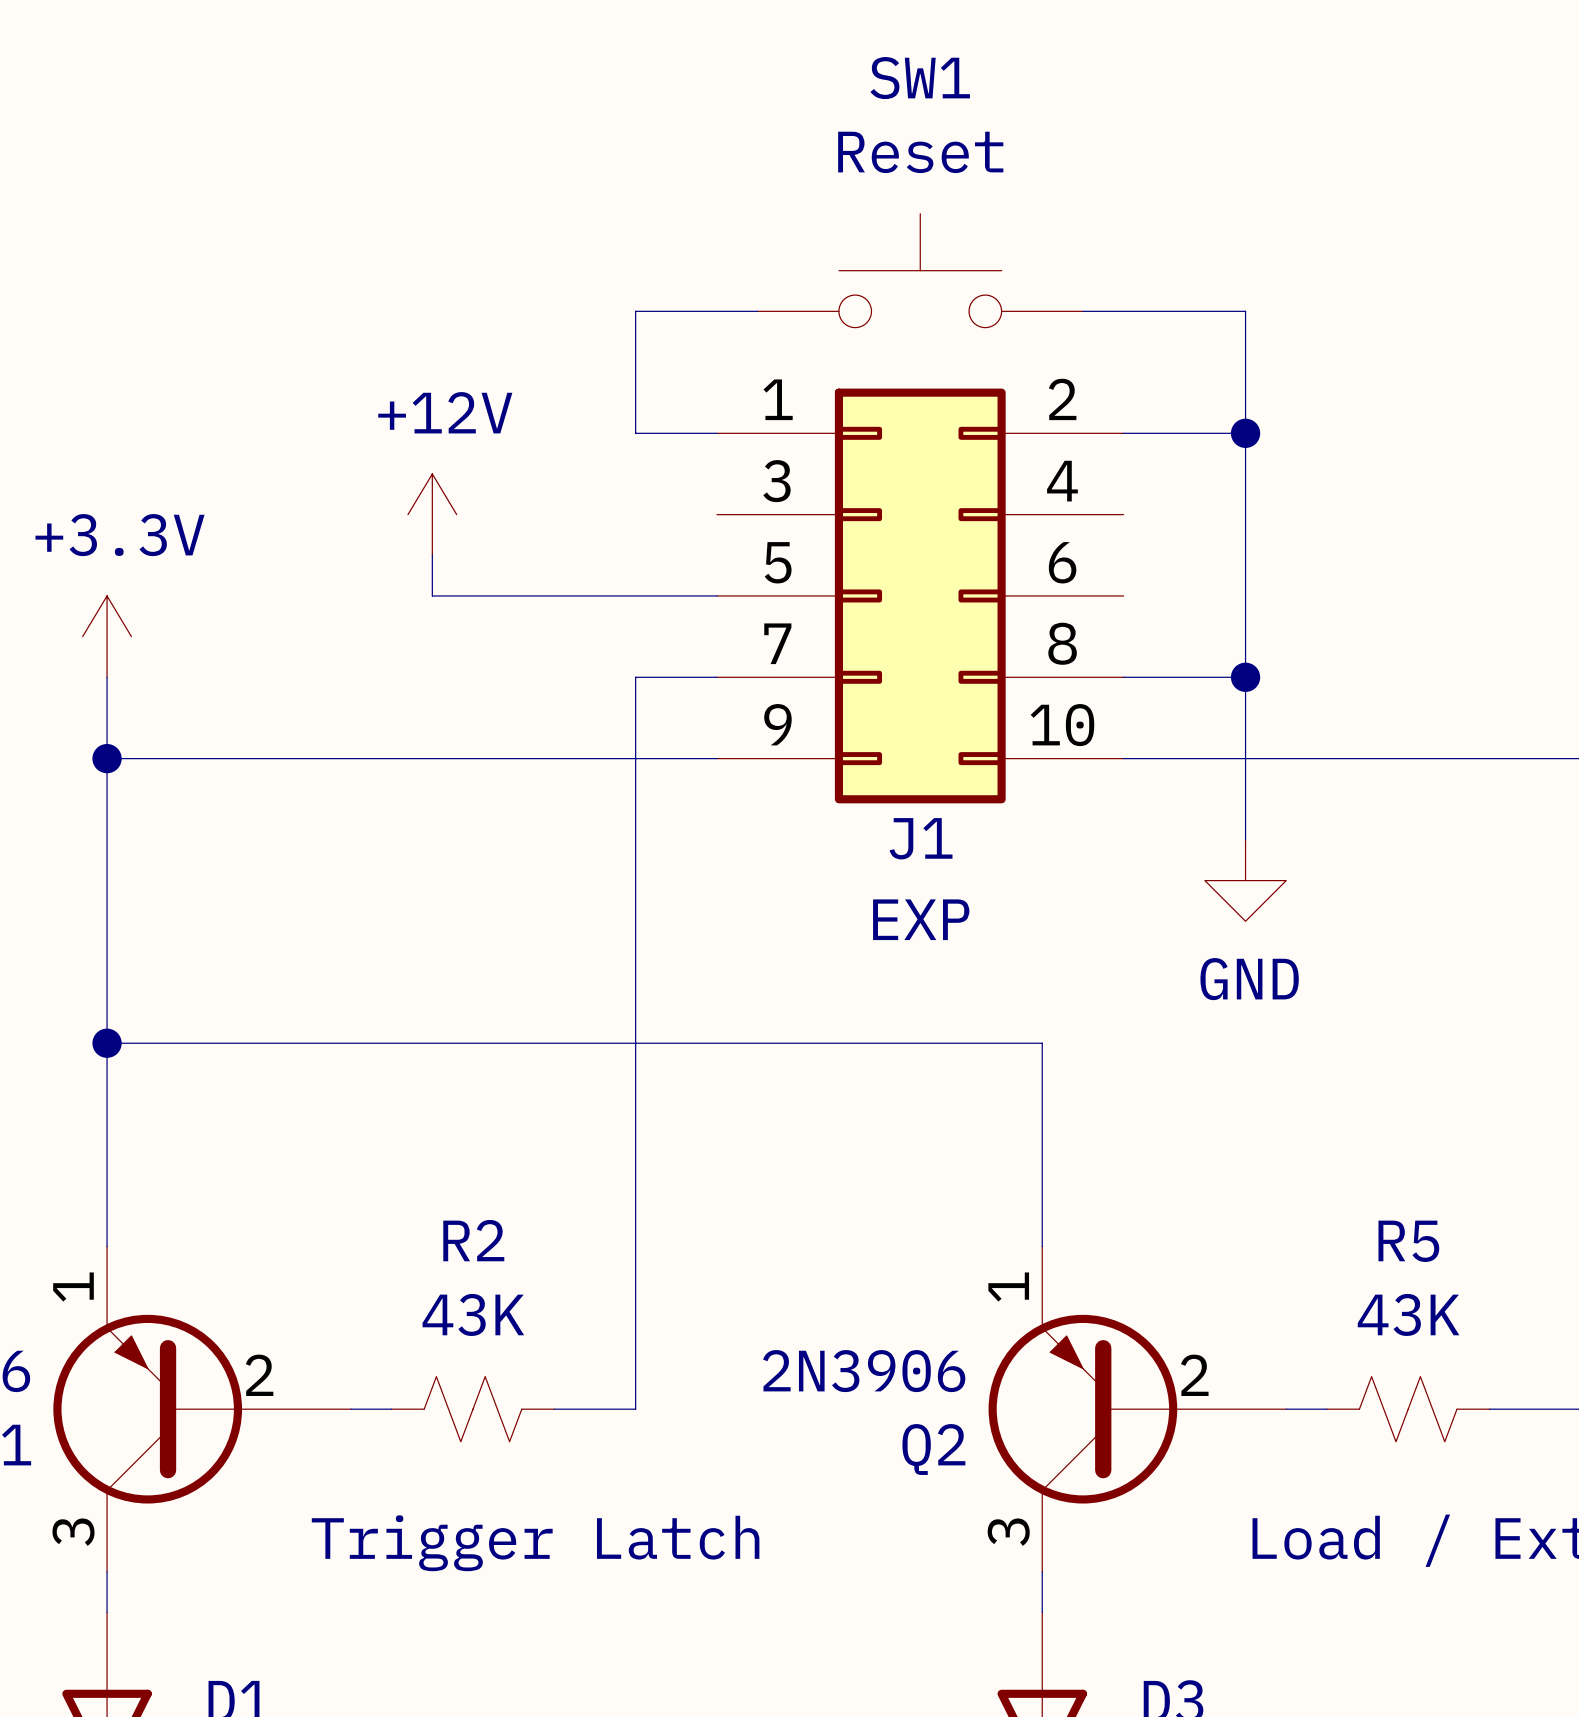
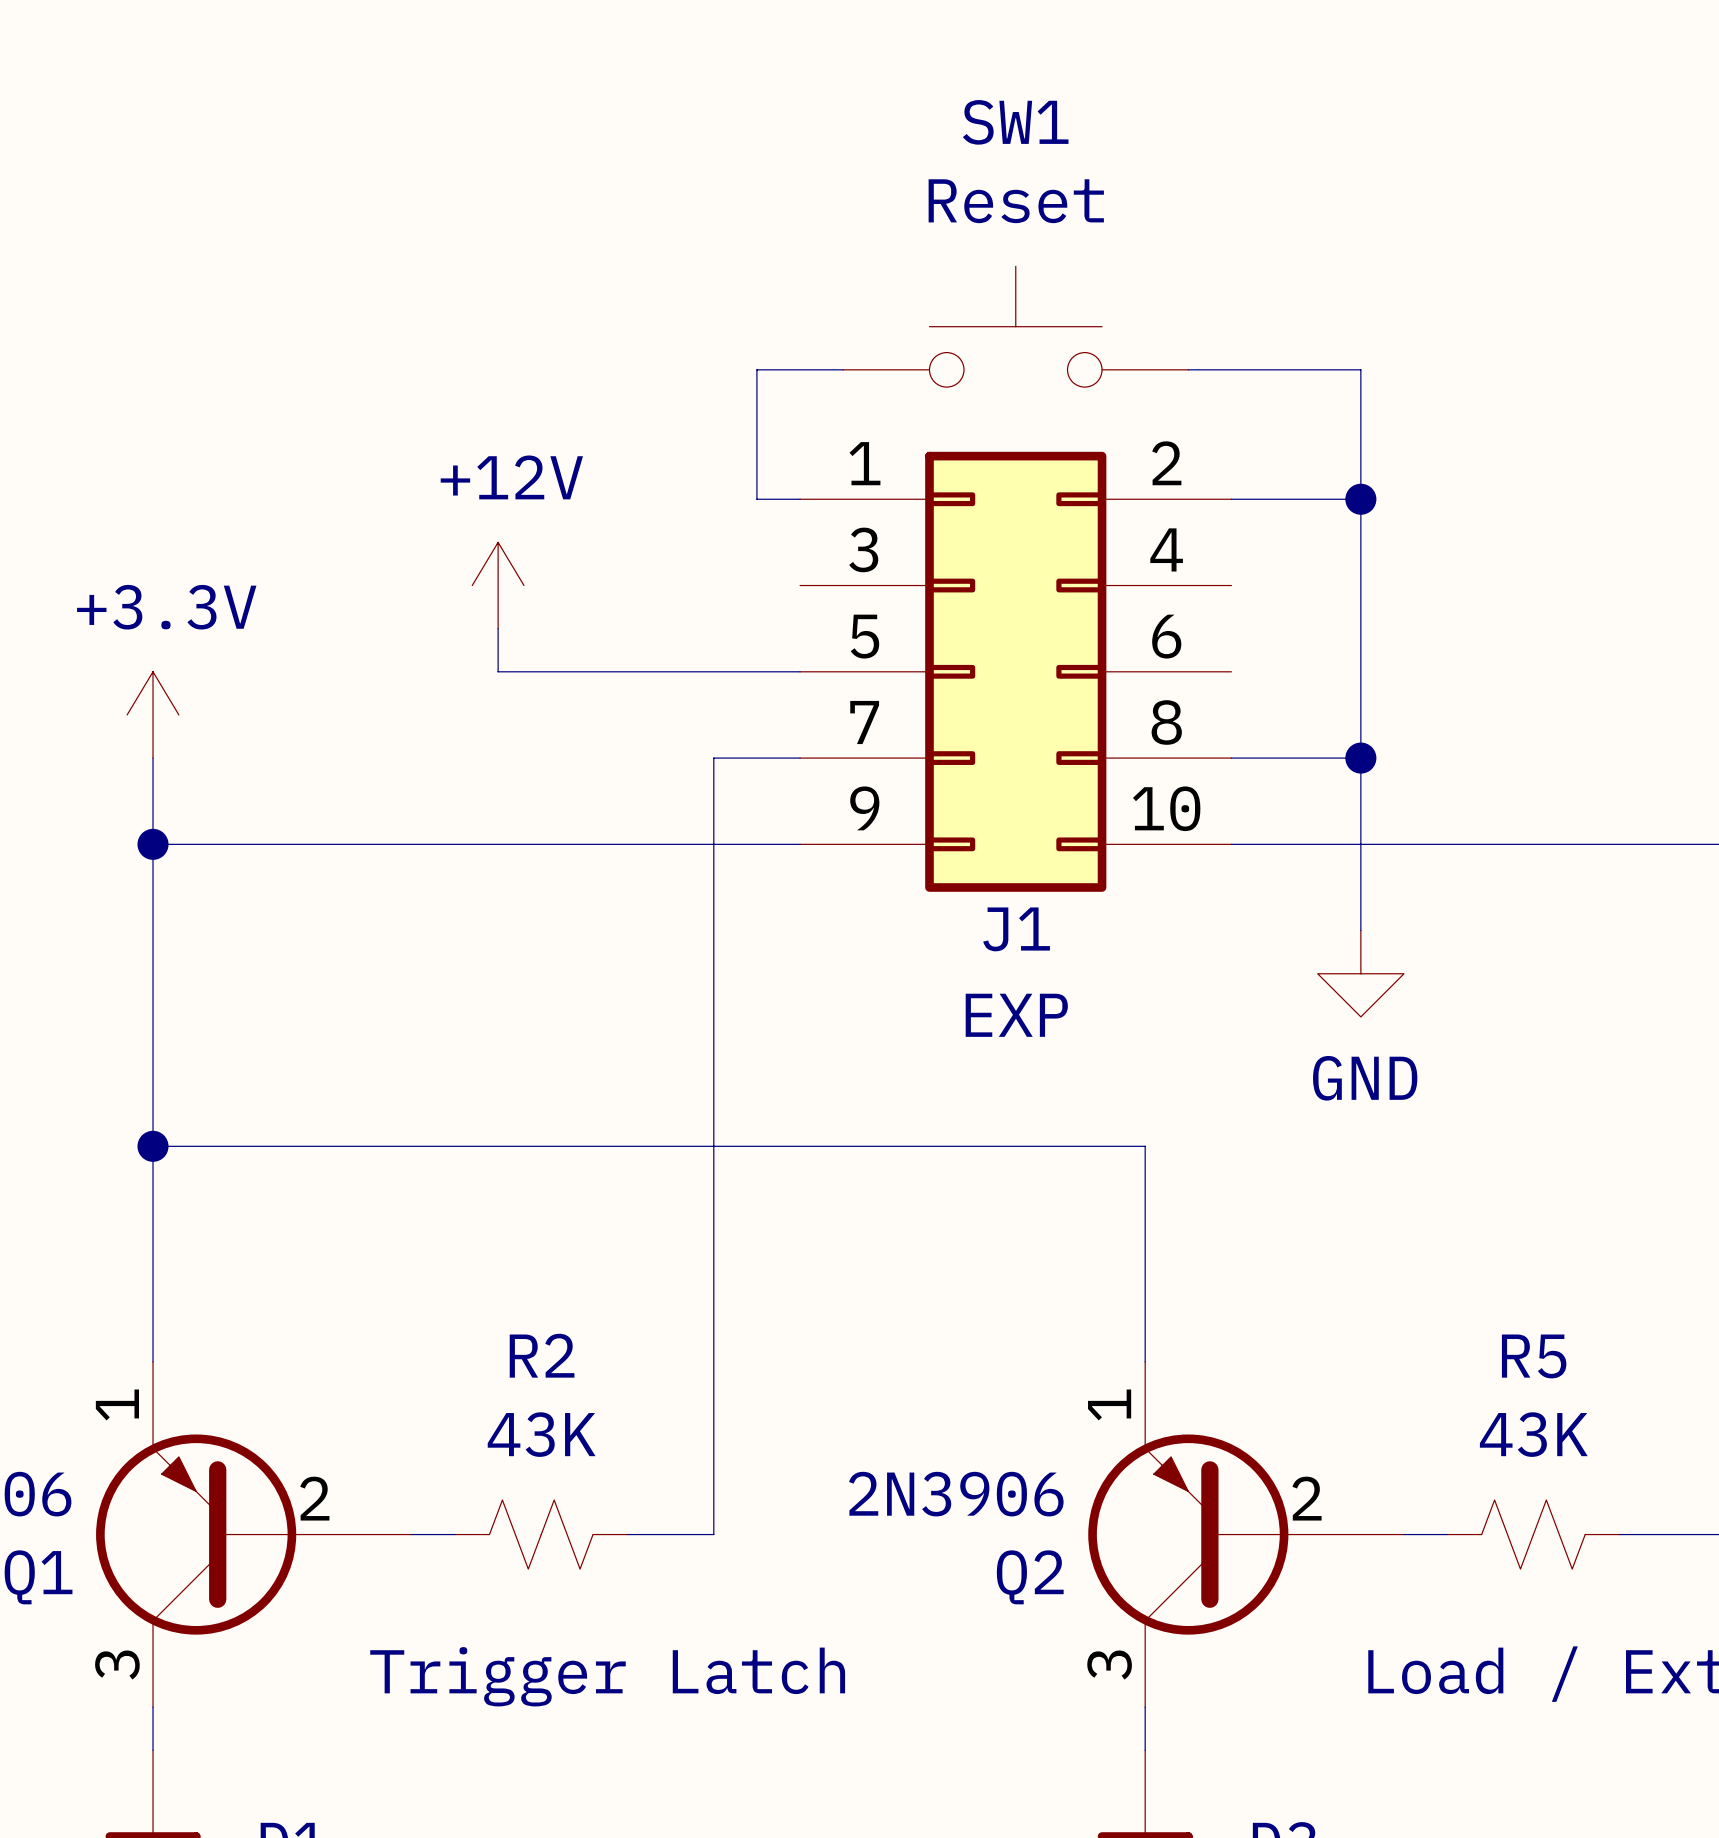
wire: (676, 311) (635, 311) (635, 433) (676, 433) -> (756, 369) (756, 499)

